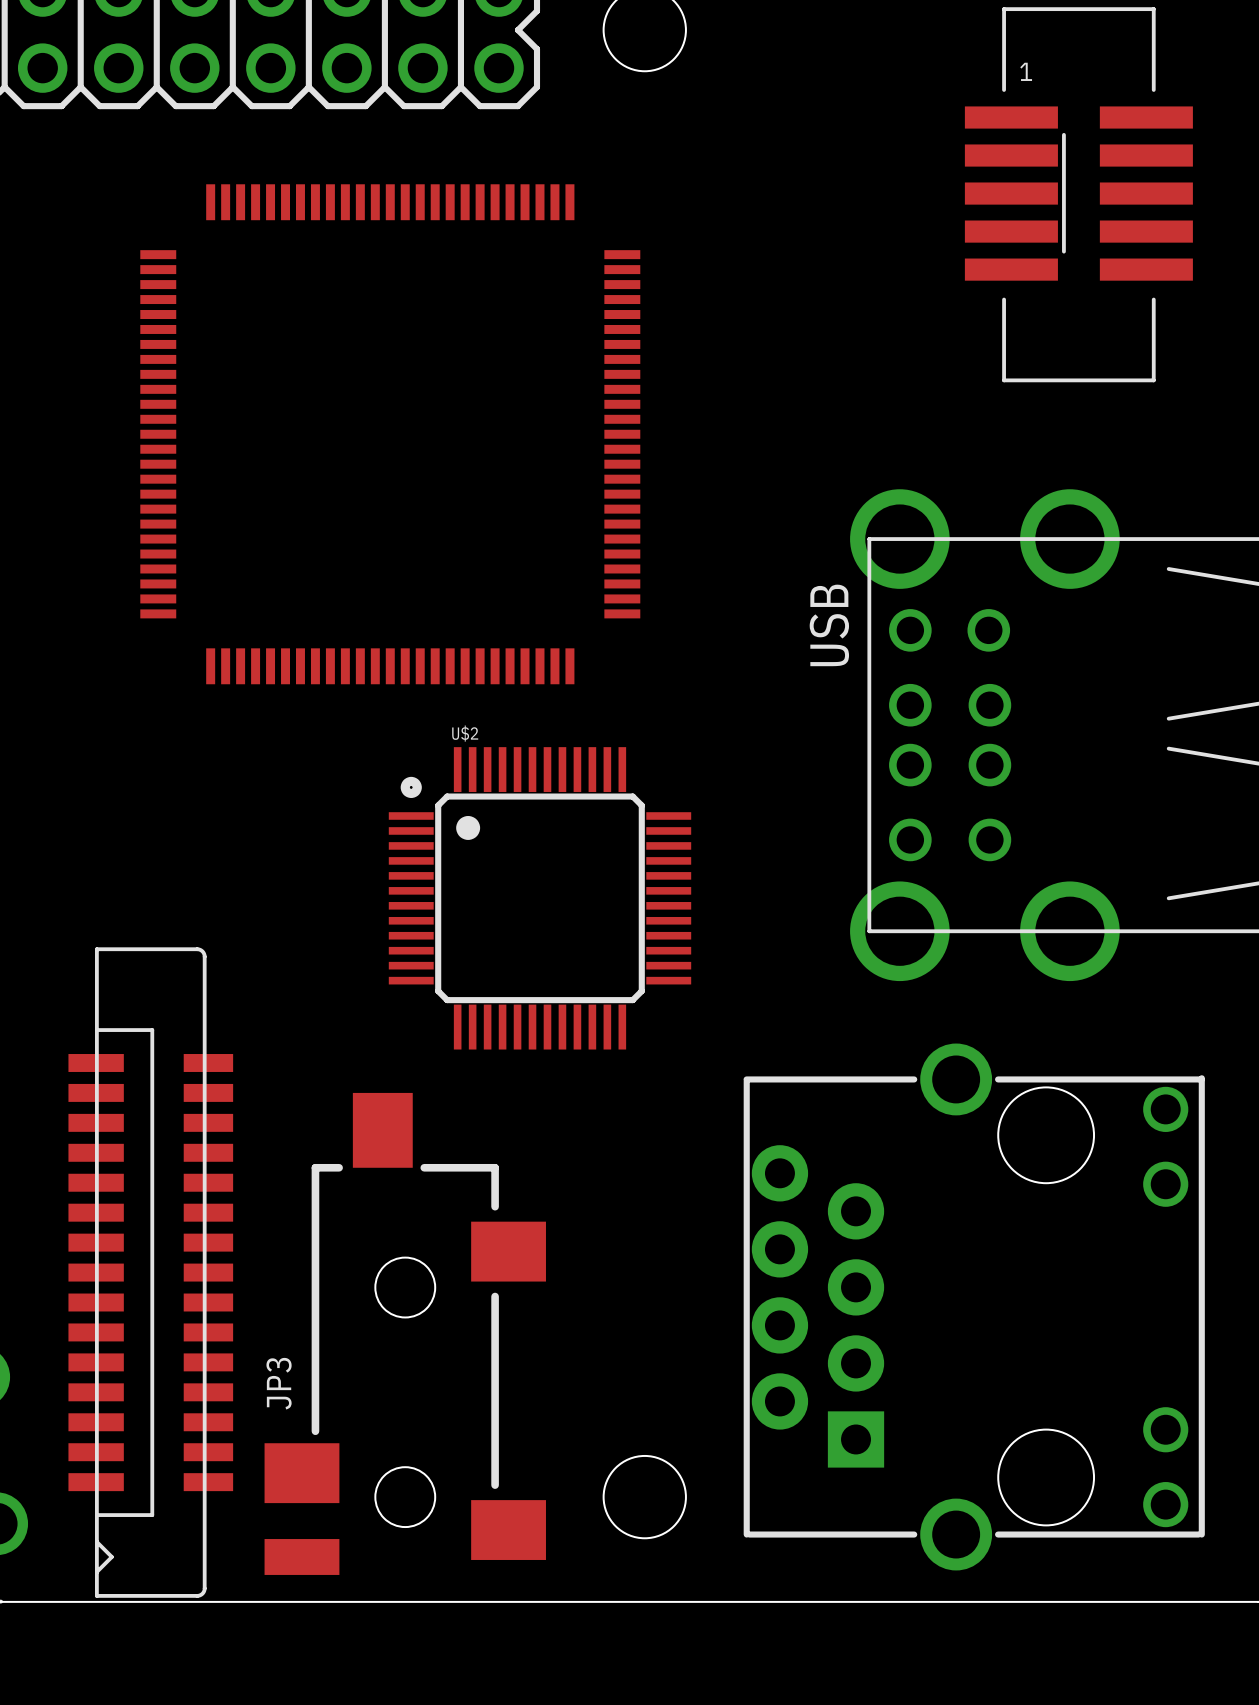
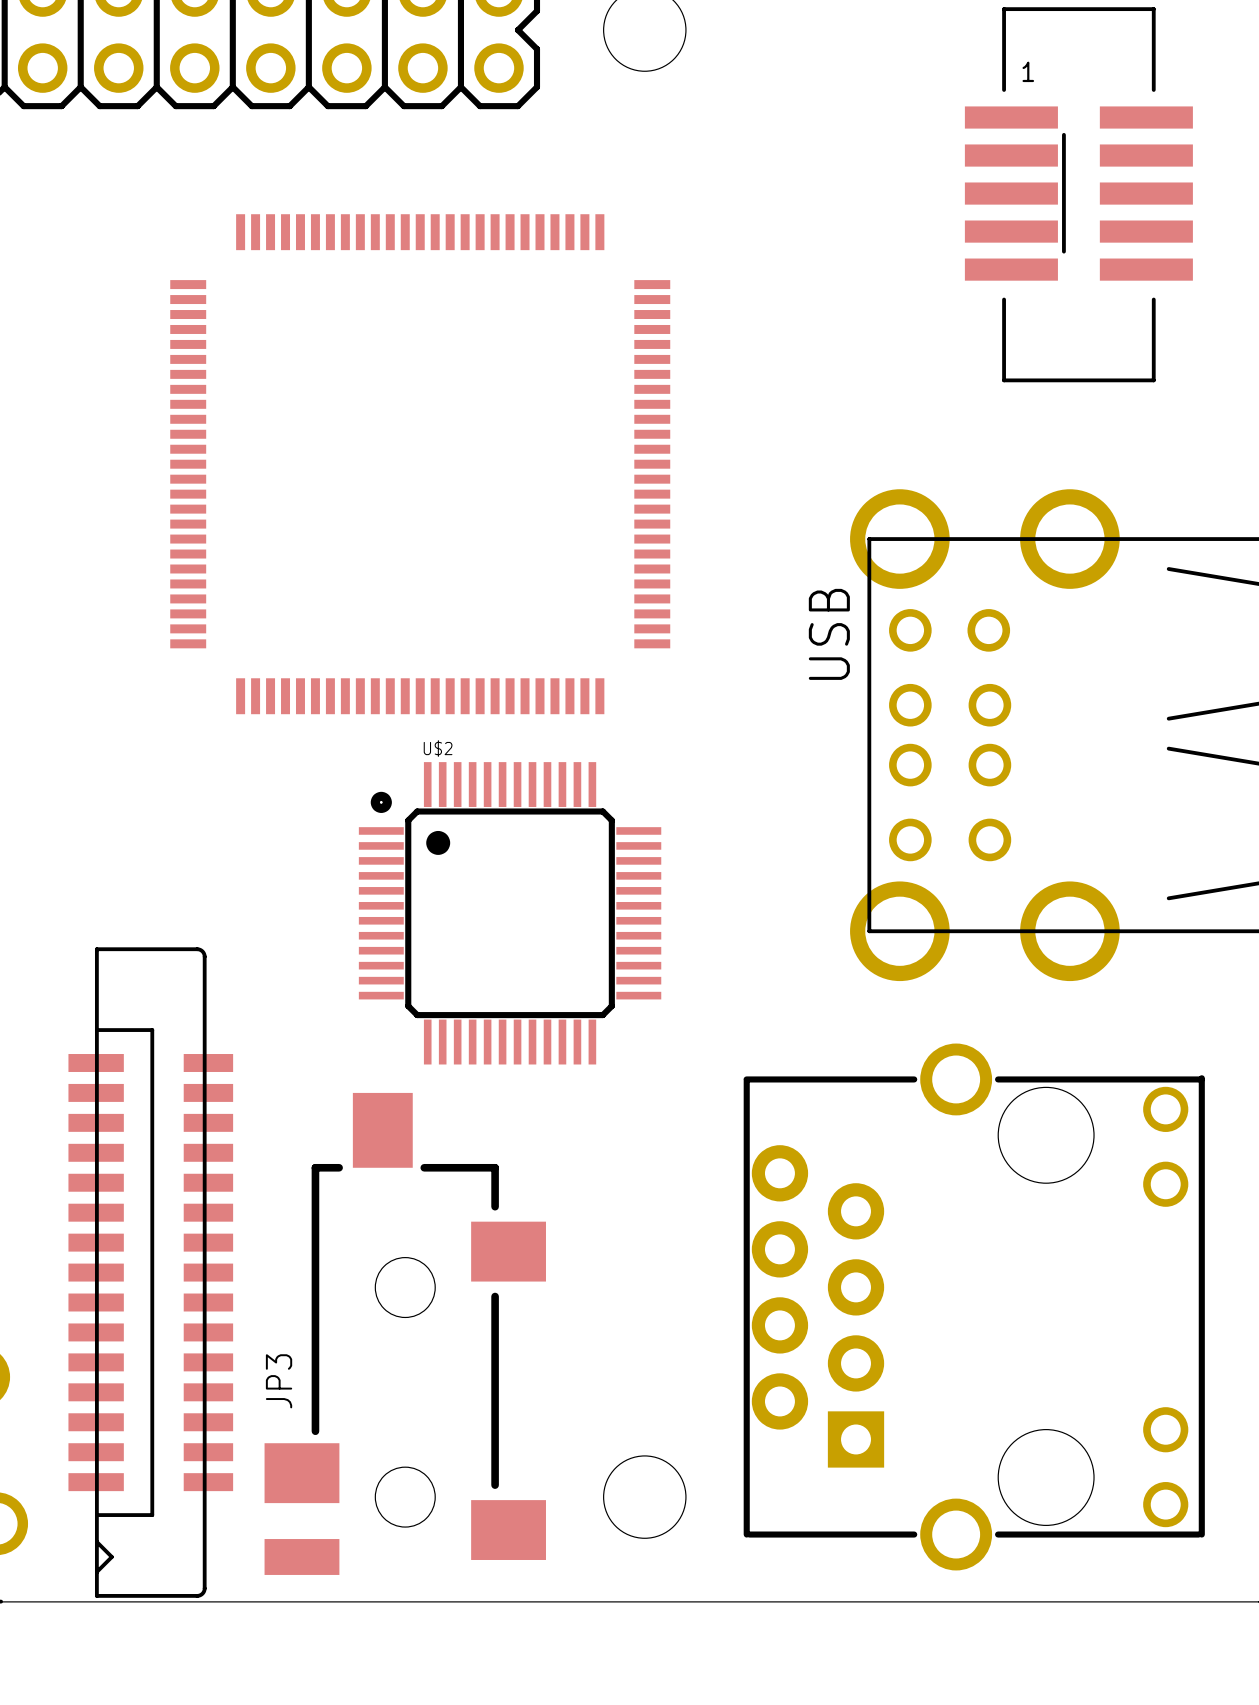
part position: (390, 434) -> (420, 464)
U$2 position: (539, 898) -> (510, 913)

